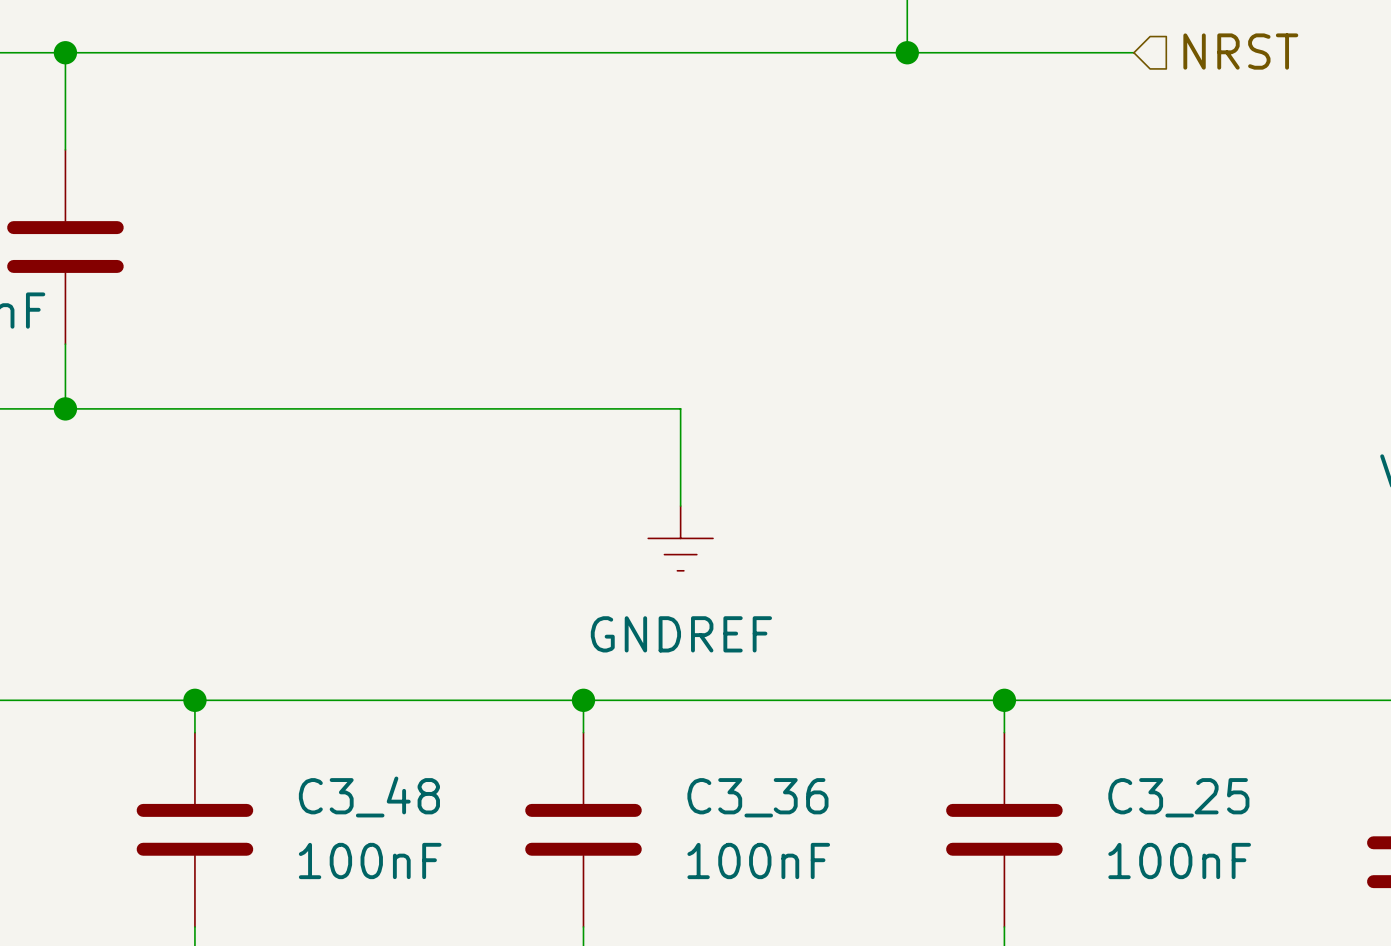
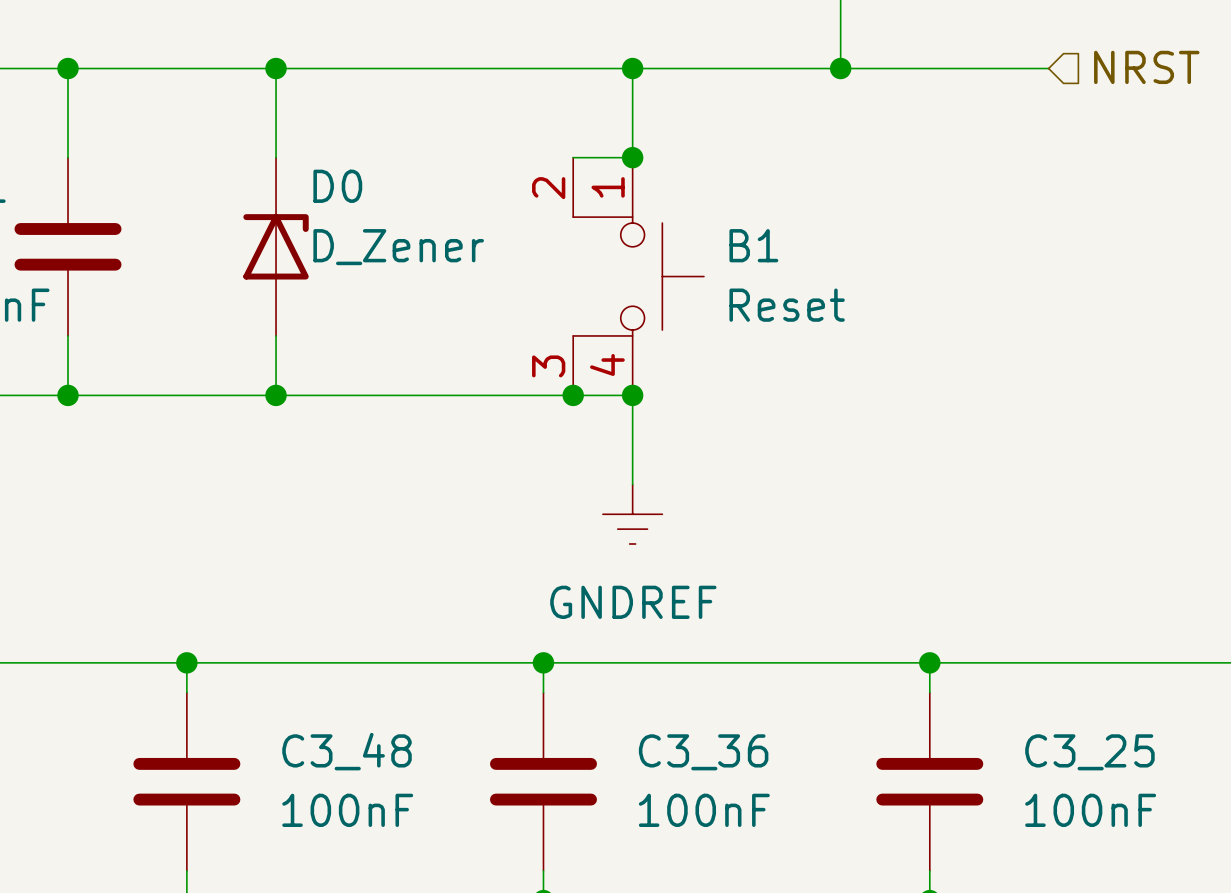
wire: none -> (276, 68) (276, 157)
junction: none -> (276, 68)
wire: none -> (632, 68) (632, 157) (573, 157)
junction: none -> (632, 68)
junction: none -> (632, 157)
D0: none -> D_Zener (276, 246)
B1: none -> Reset (638, 276)
wire: none -> (276, 335) (276, 395)
junction: none -> (276, 395)
junction: none -> (573, 395)
junction: none -> (632, 395)

